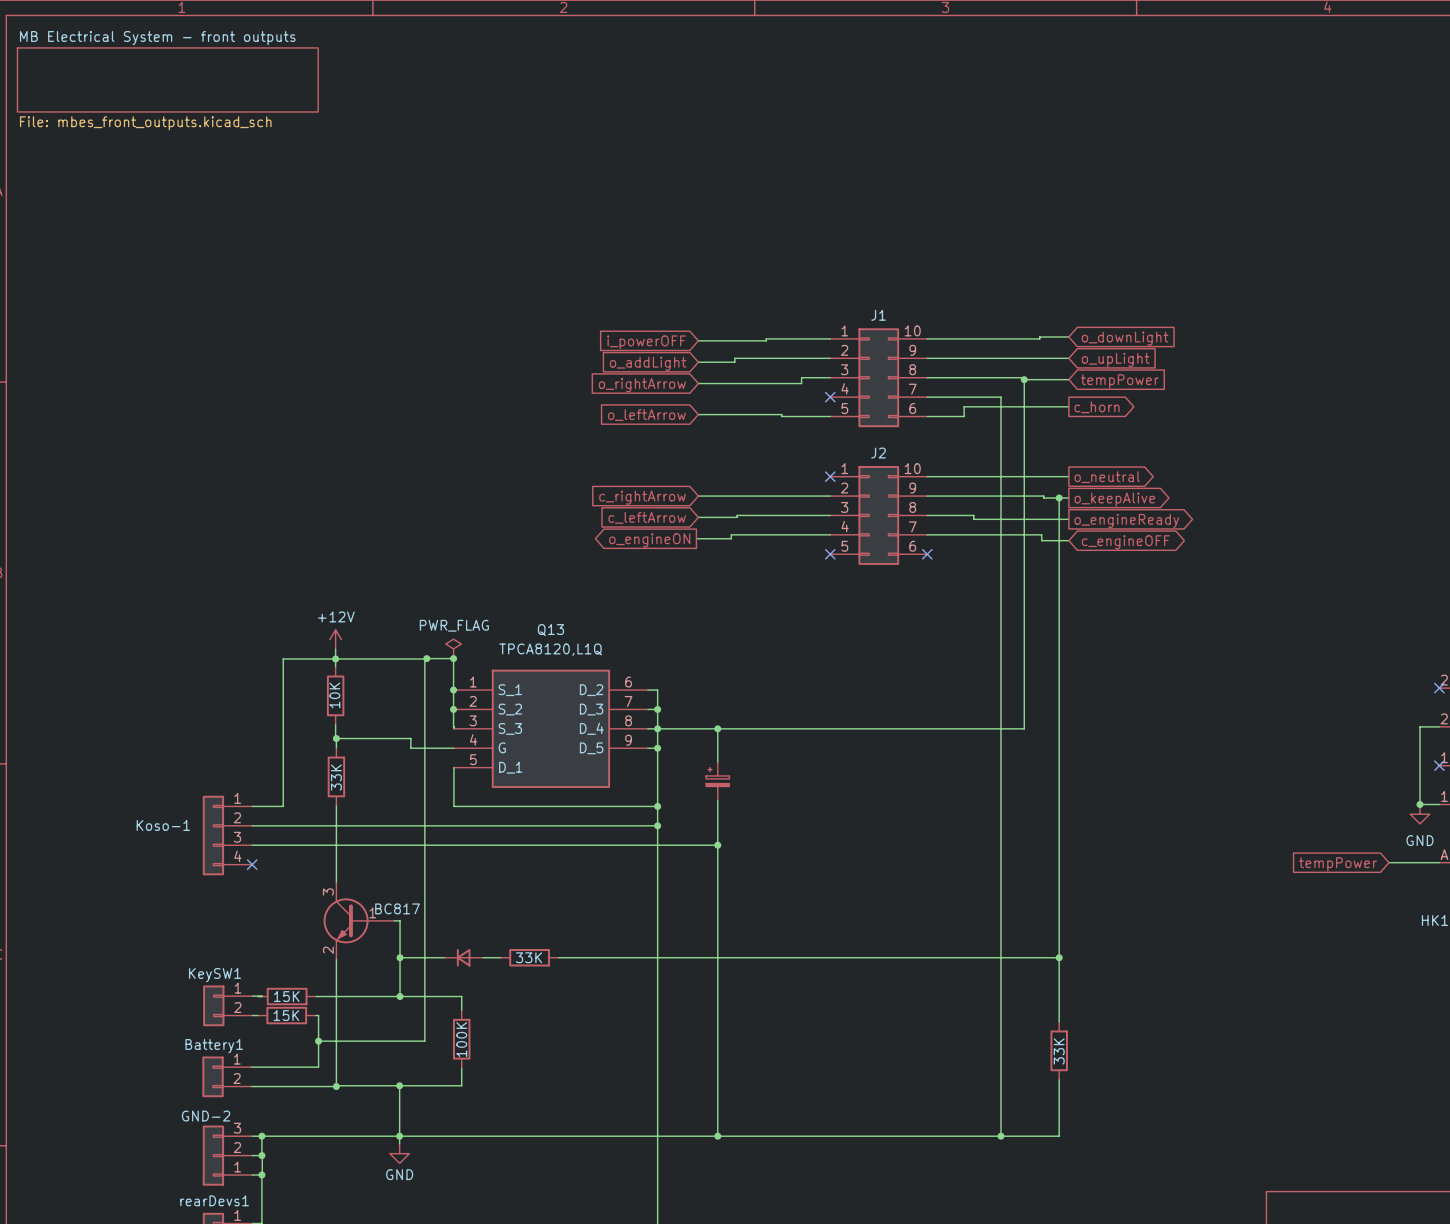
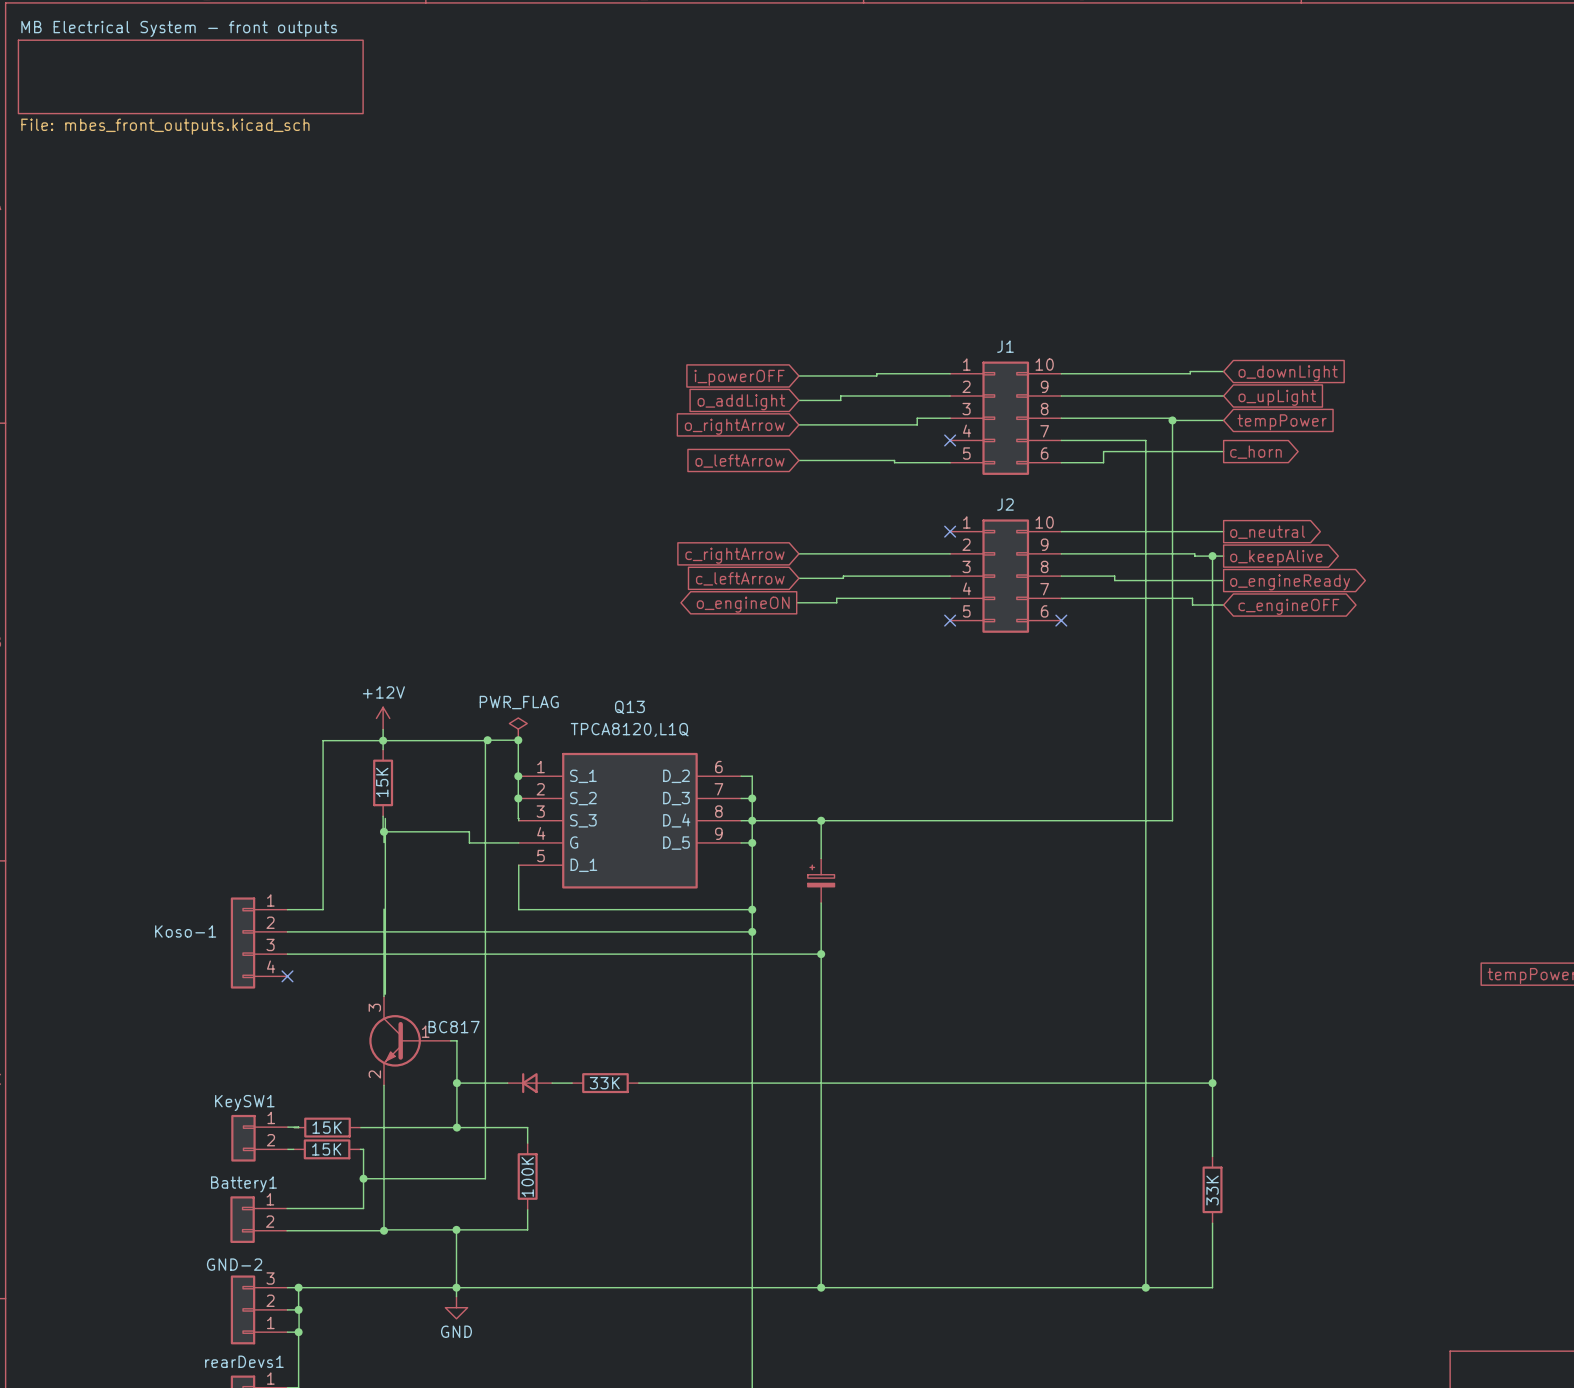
part value: 10K (334, 695) -> 15K (382, 782)
wire: none -> (385, 818) (385, 994)
part: 33K (336, 776) -> none

